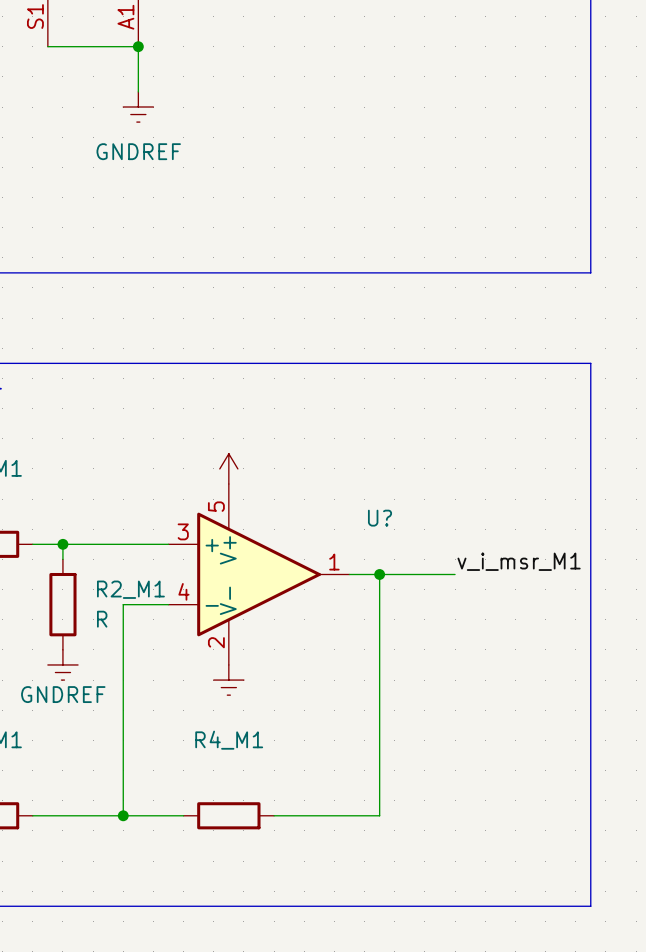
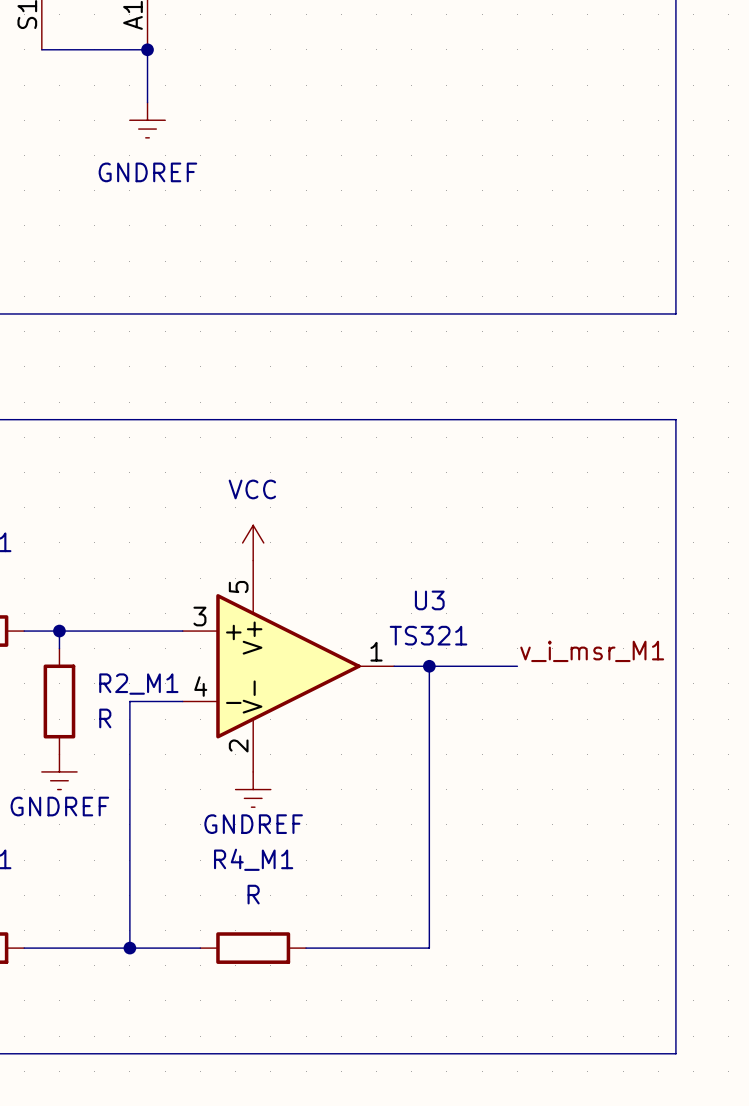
power symbol text: none -> VCC (252, 489)
U? name: U? (380, 518) -> U3 (429, 600)
U? value: none -> TS321 (428, 635)
power symbol text: none -> GNDREF (253, 824)
R4_M1 value: none -> R (253, 894)

